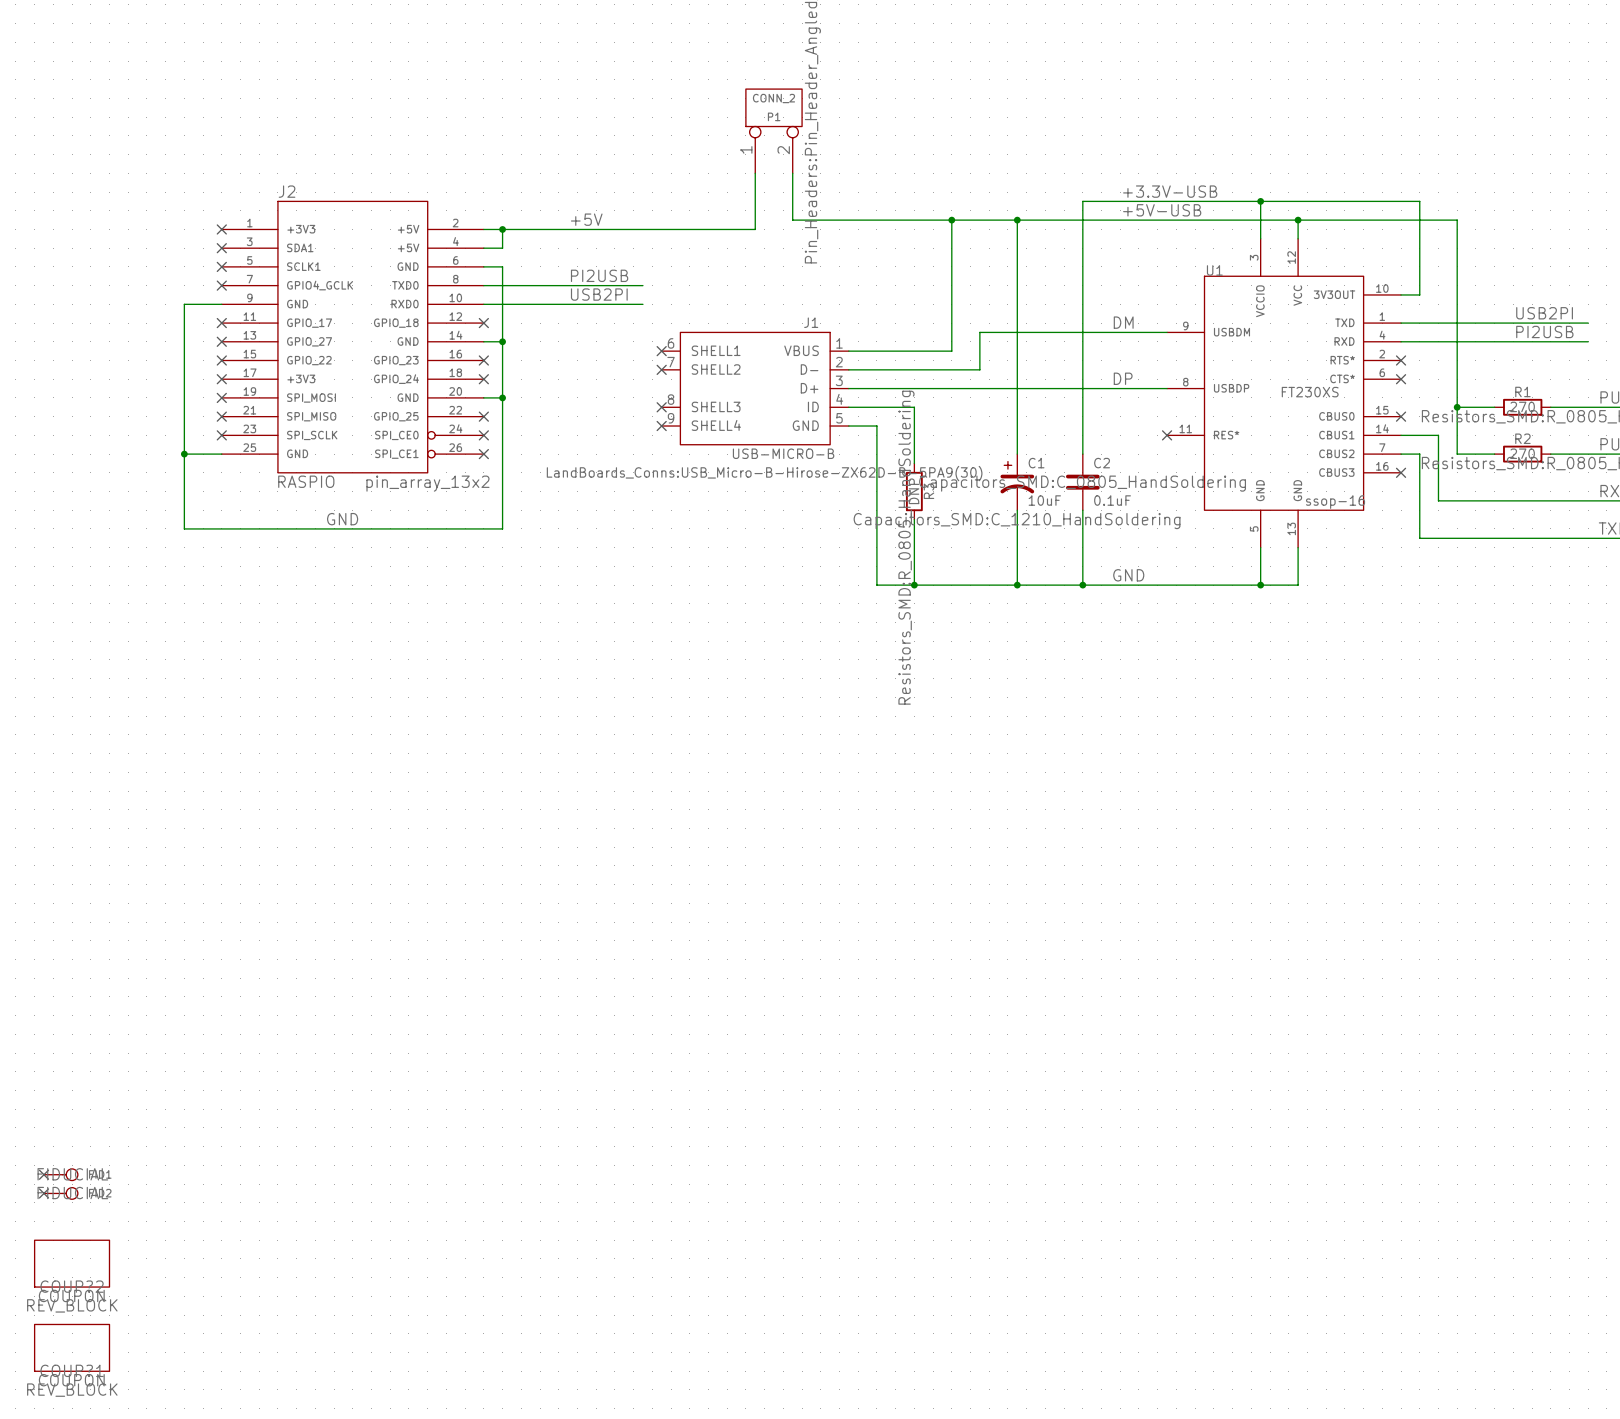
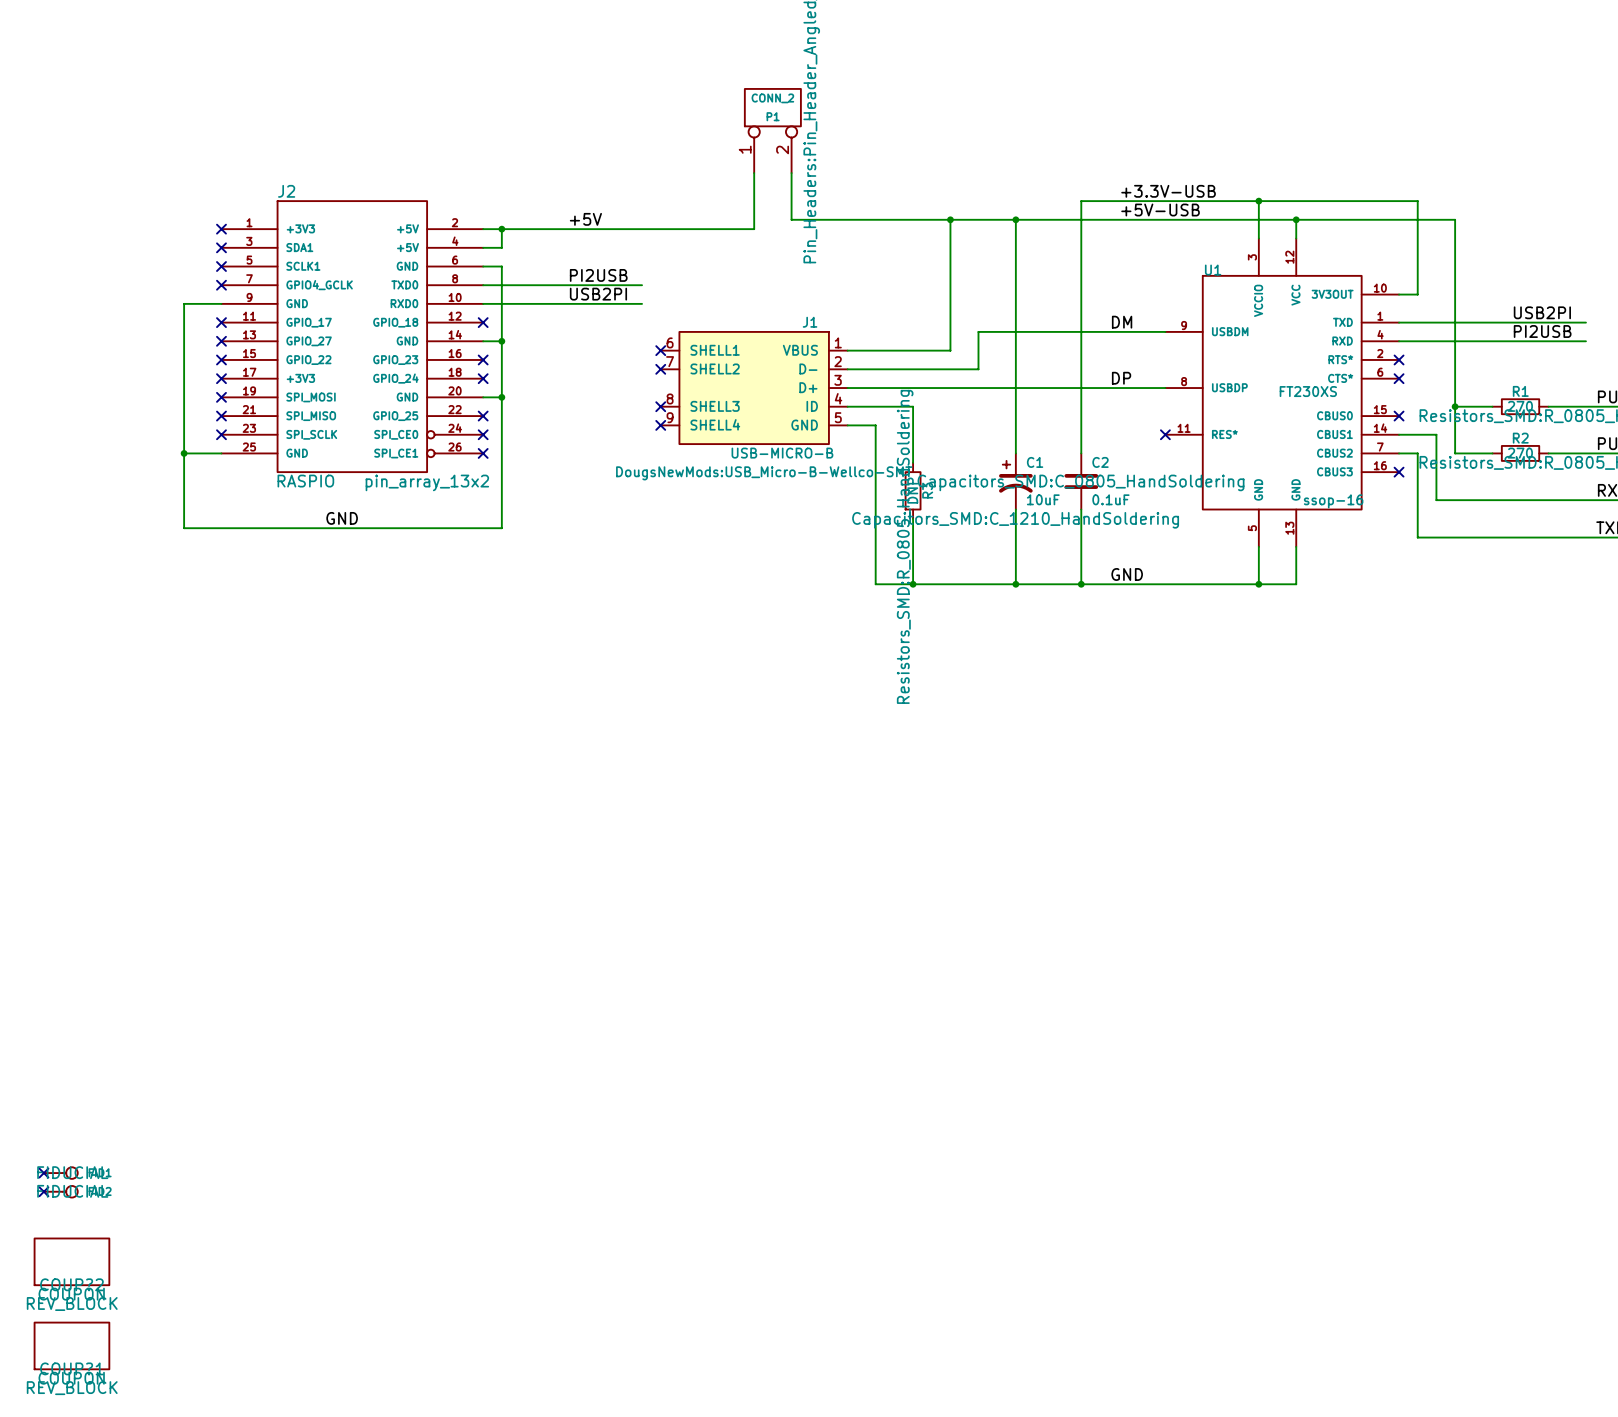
J1 text: LandBoards_Conns:USB_Micro-B-Hirose-ZX62D-B-5PA9(30) (764, 473) -> DougsNewMods:USB_Micro-B-Wellco-SMT (764, 473)

